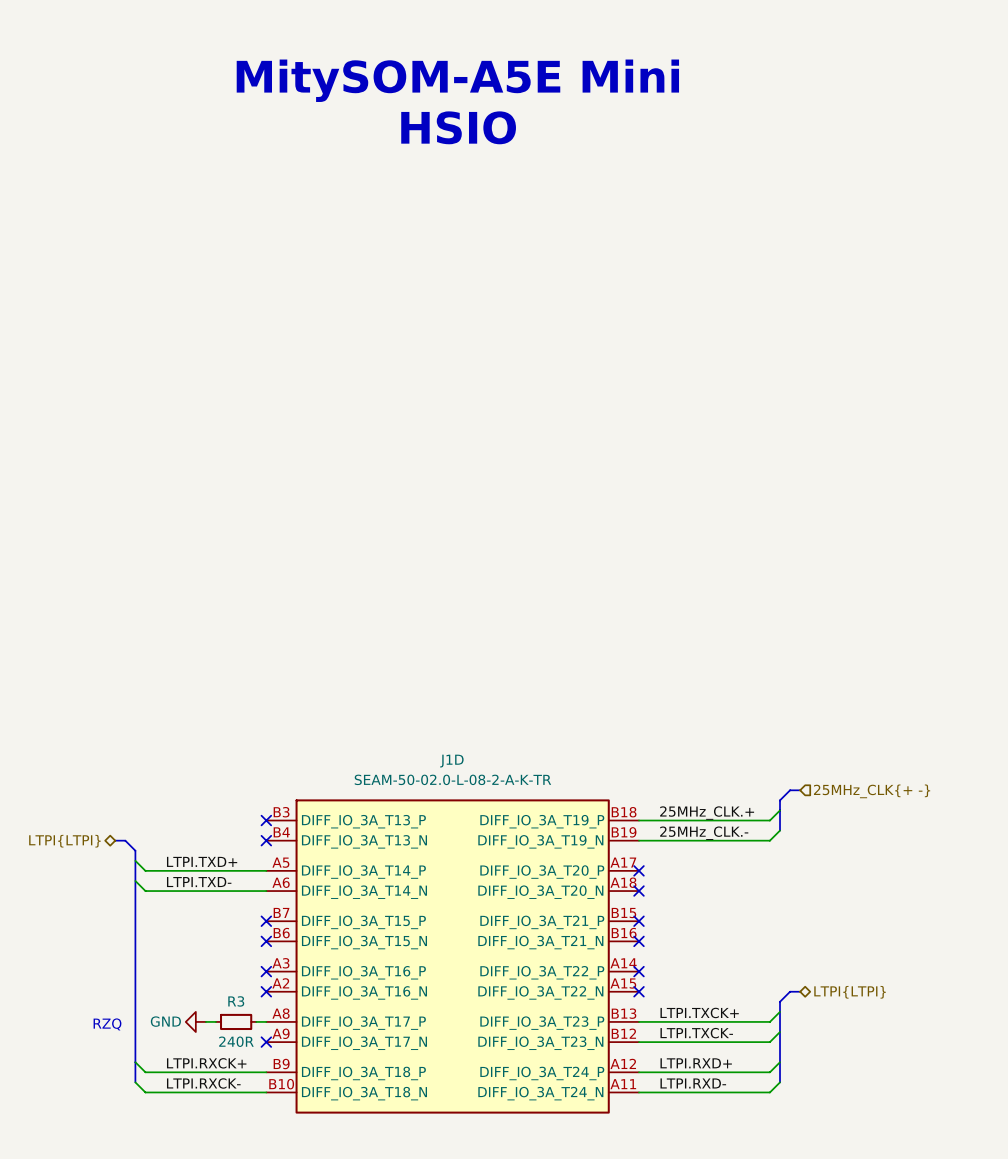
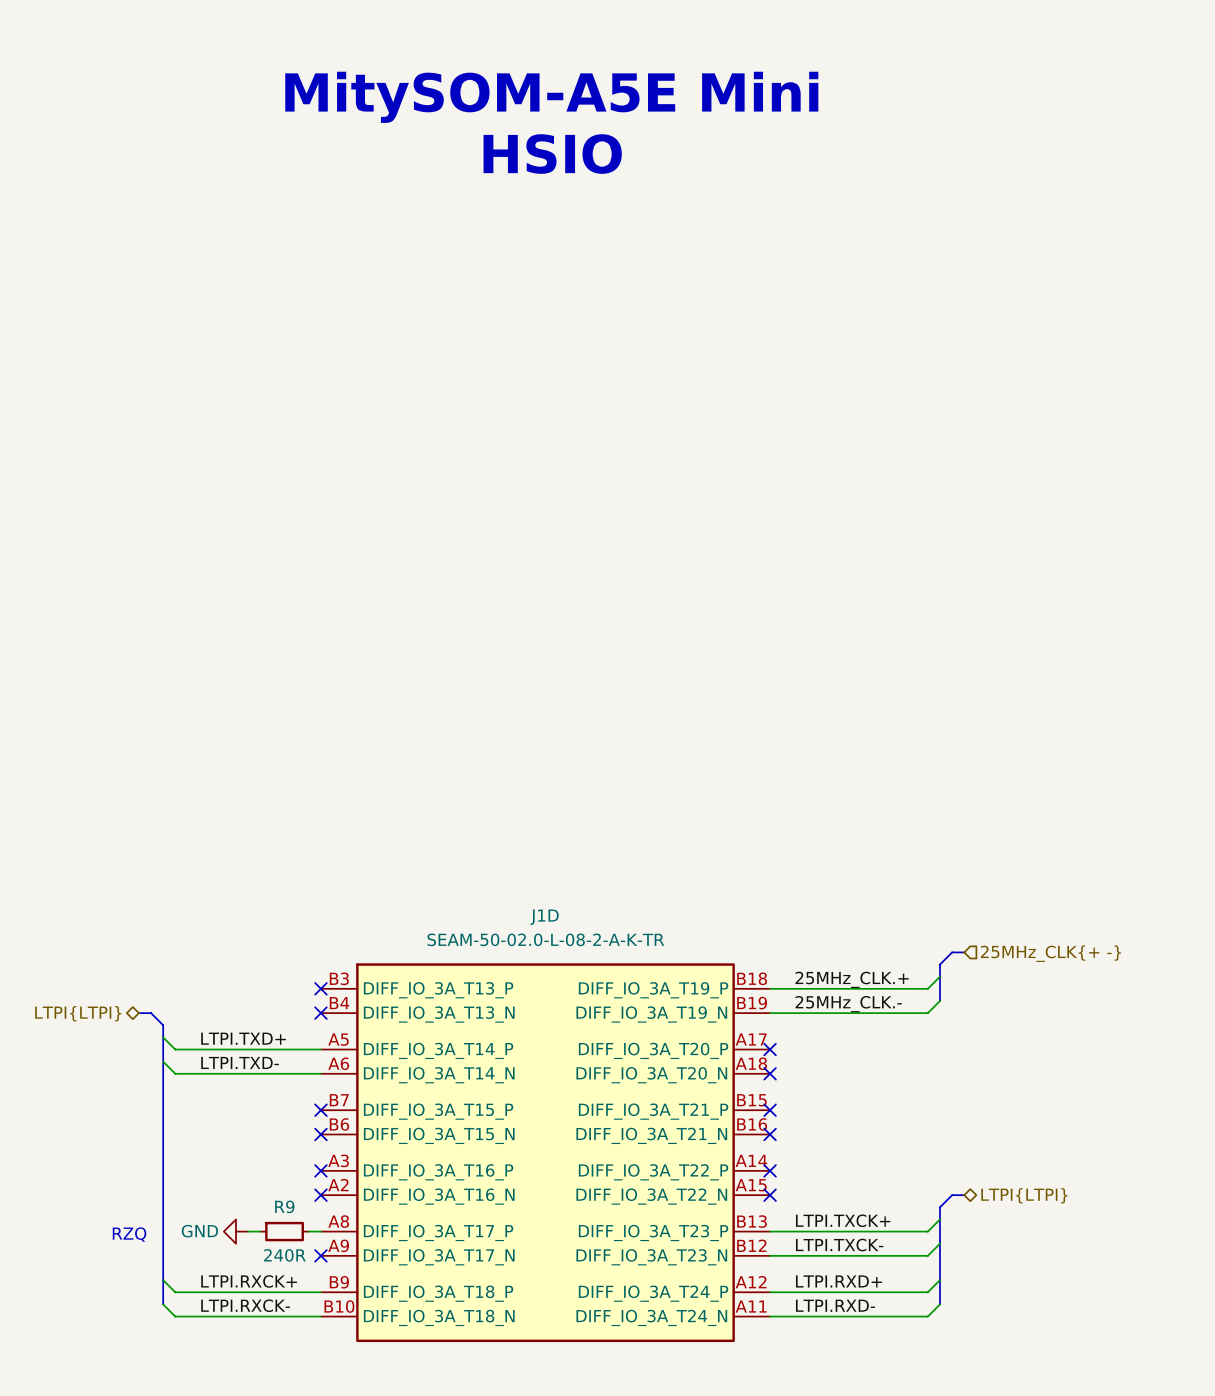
R3 name: R3 (236, 1001) -> R9 (284, 1206)

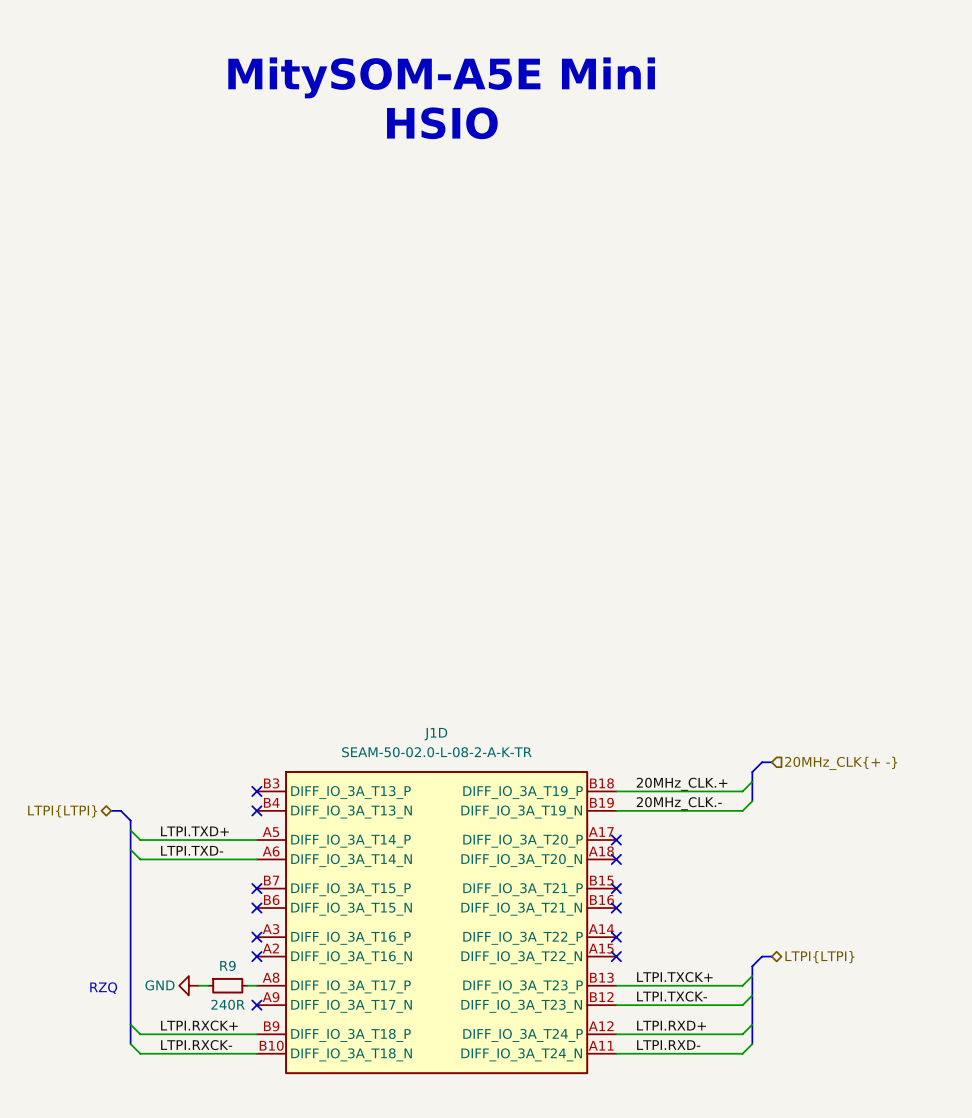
hierarchical label: 25MHz_CLK{+ -} (1050, 953) -> 20MHz_CLK{+ -} (841, 763)
label: 25MHz_CLK.+ (852, 979) -> 20MHz_CLK.+ (682, 784)
label: 25MHz_CLK.- (848, 1004) -> 20MHz_CLK.- (679, 803)

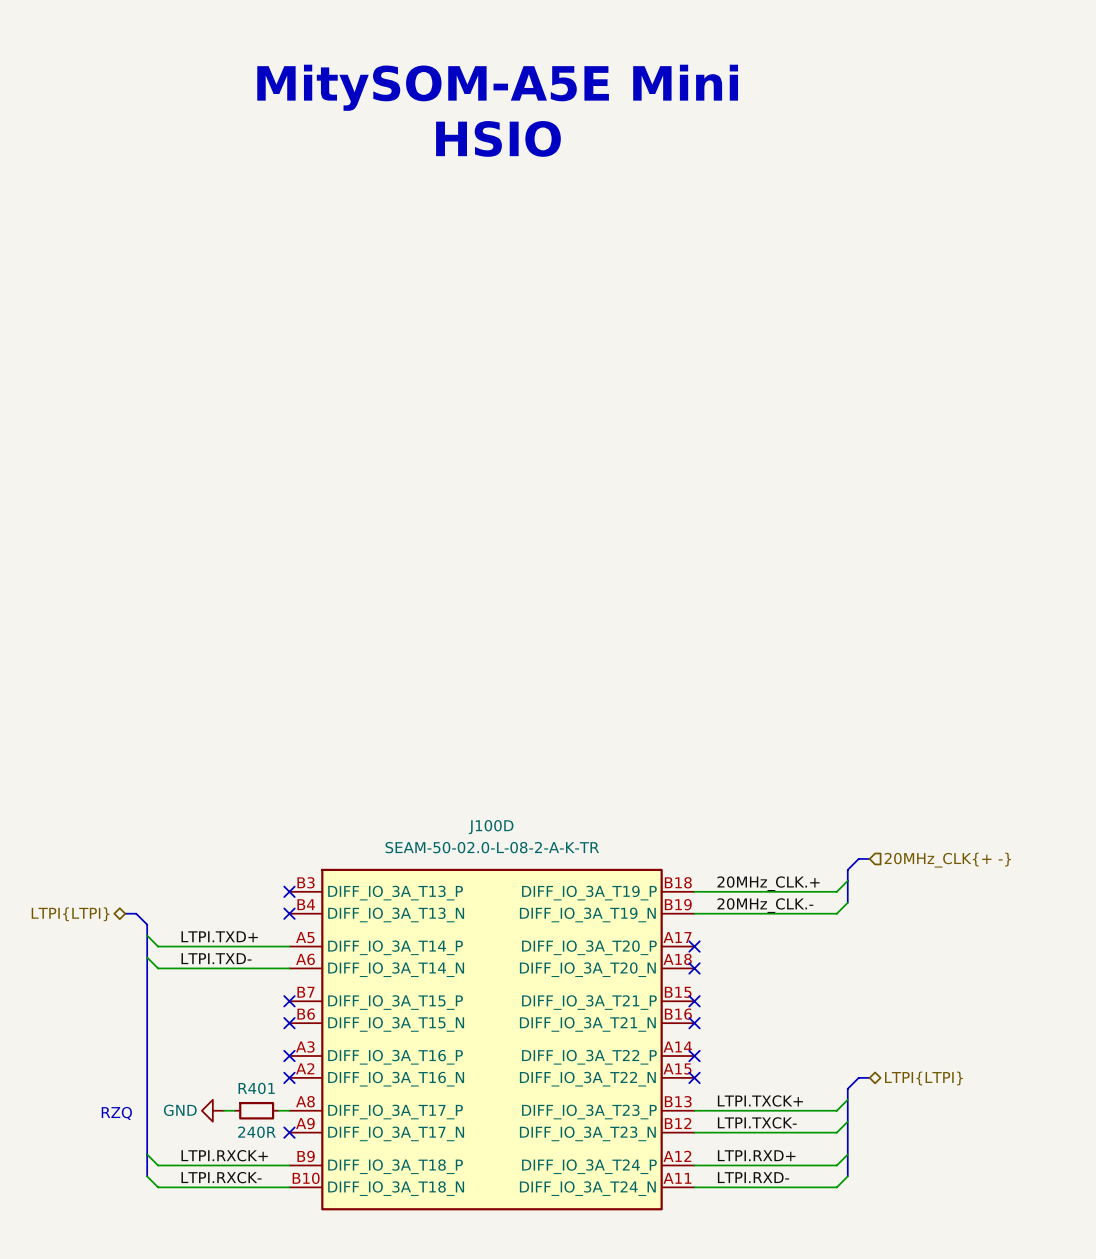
J1D name: J1D (435, 734) -> J100D (491, 827)
R9 name: R9 (227, 965) -> R401 (256, 1088)

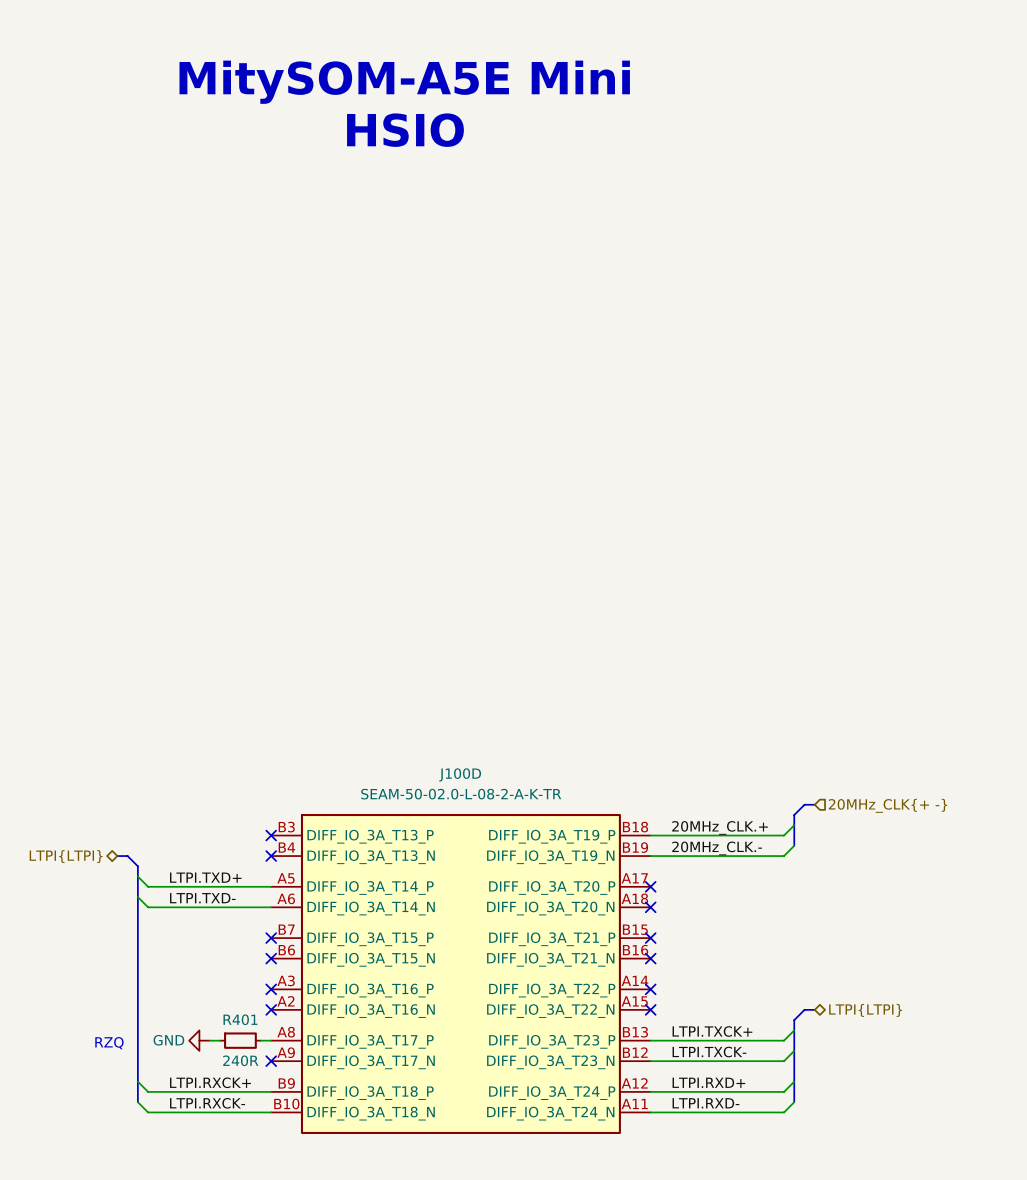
text position: MitySOM-A5E Mini (497, 87) -> MitySOM-A5E Mini (404, 82)
text position: HSIO (498, 138) -> HSIO (405, 130)

